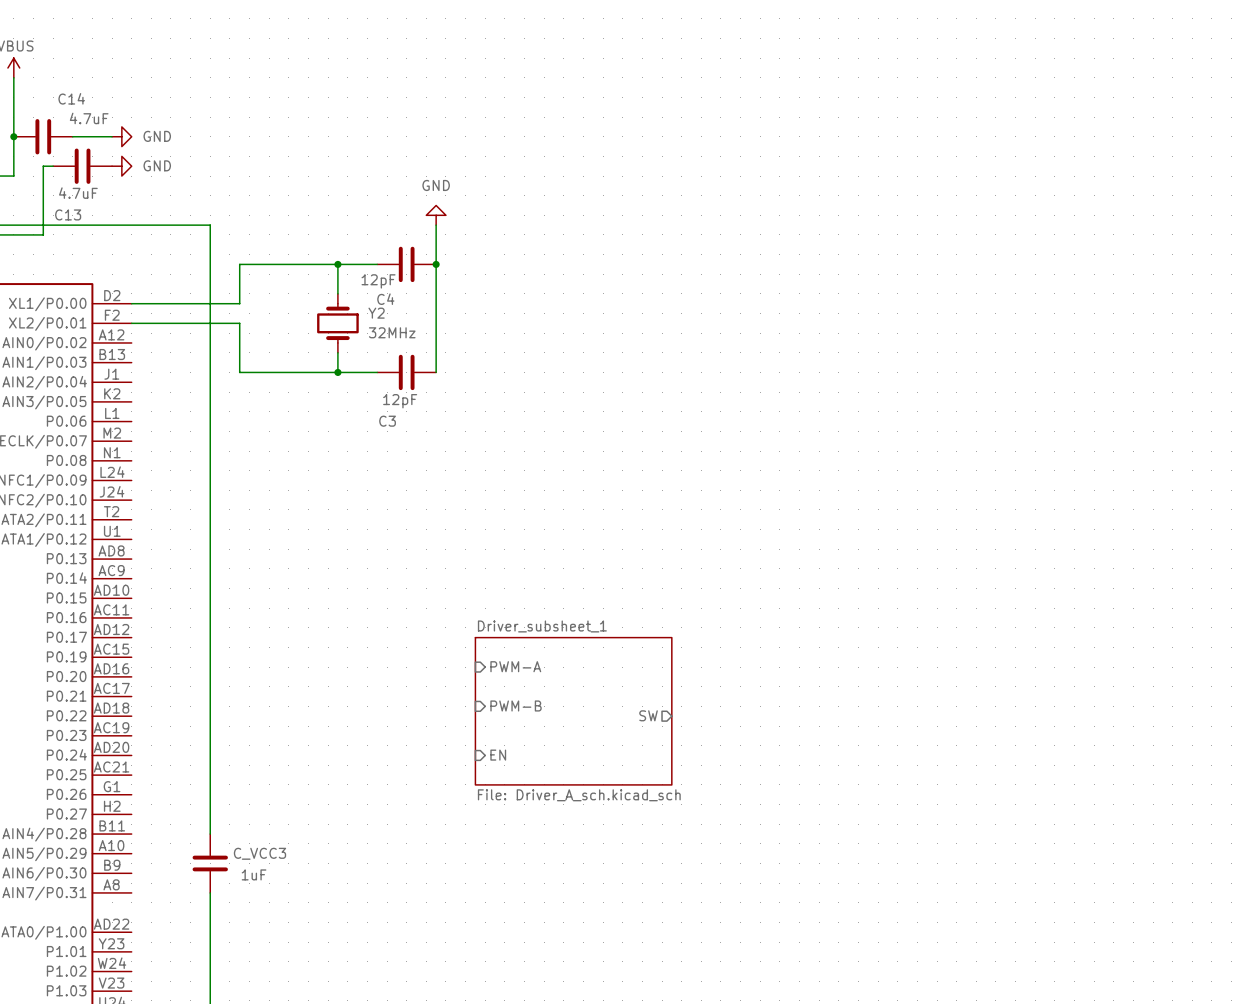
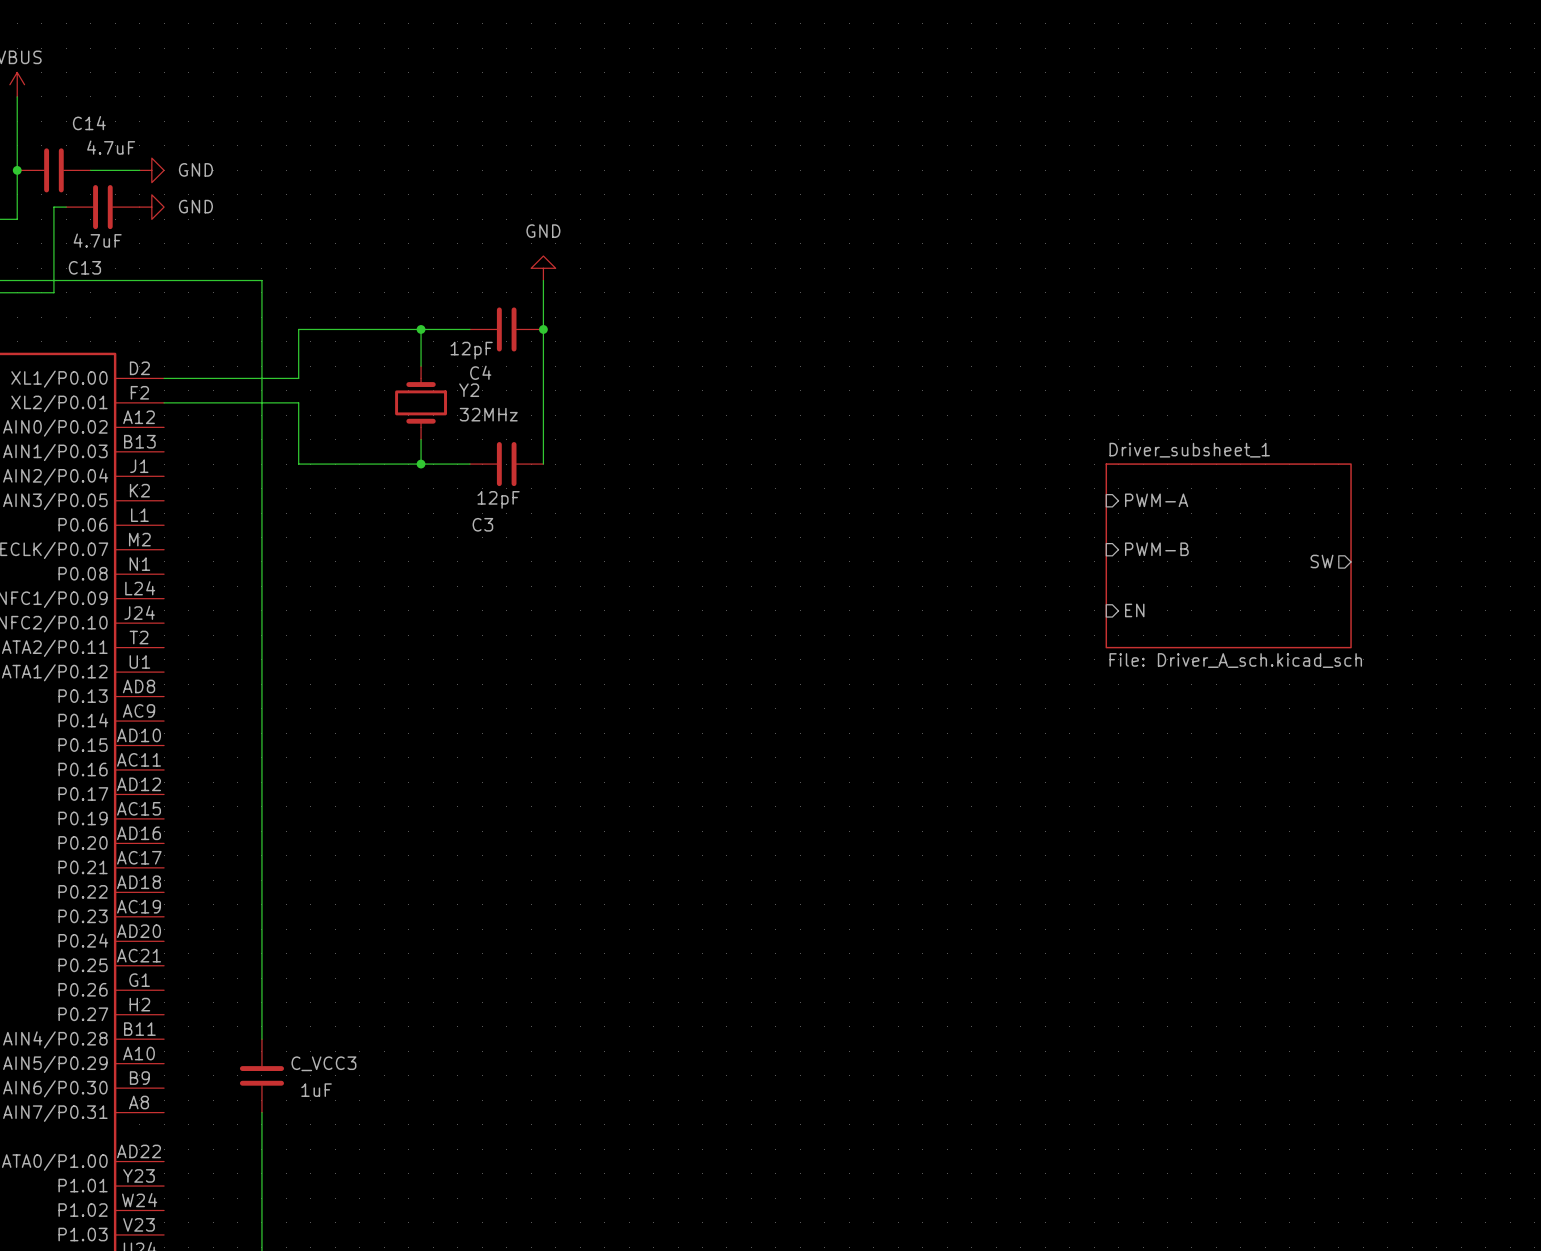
sheet pin: none -> PWM-A (1156, 500)
sheet pin: none -> PWM-B (1156, 549)
sheet pin: none -> SW (1321, 561)
sheet pin: none -> EN (1134, 610)
sheet pin: PWM-A (515, 666) -> none
sheet pin: PWM-B (516, 705) -> none
sheet Driver_subsheet_1 position: (573, 711) -> (1228, 555)
sheet pin: SW (648, 715) -> none
sheet pin: EN (498, 755) -> none

